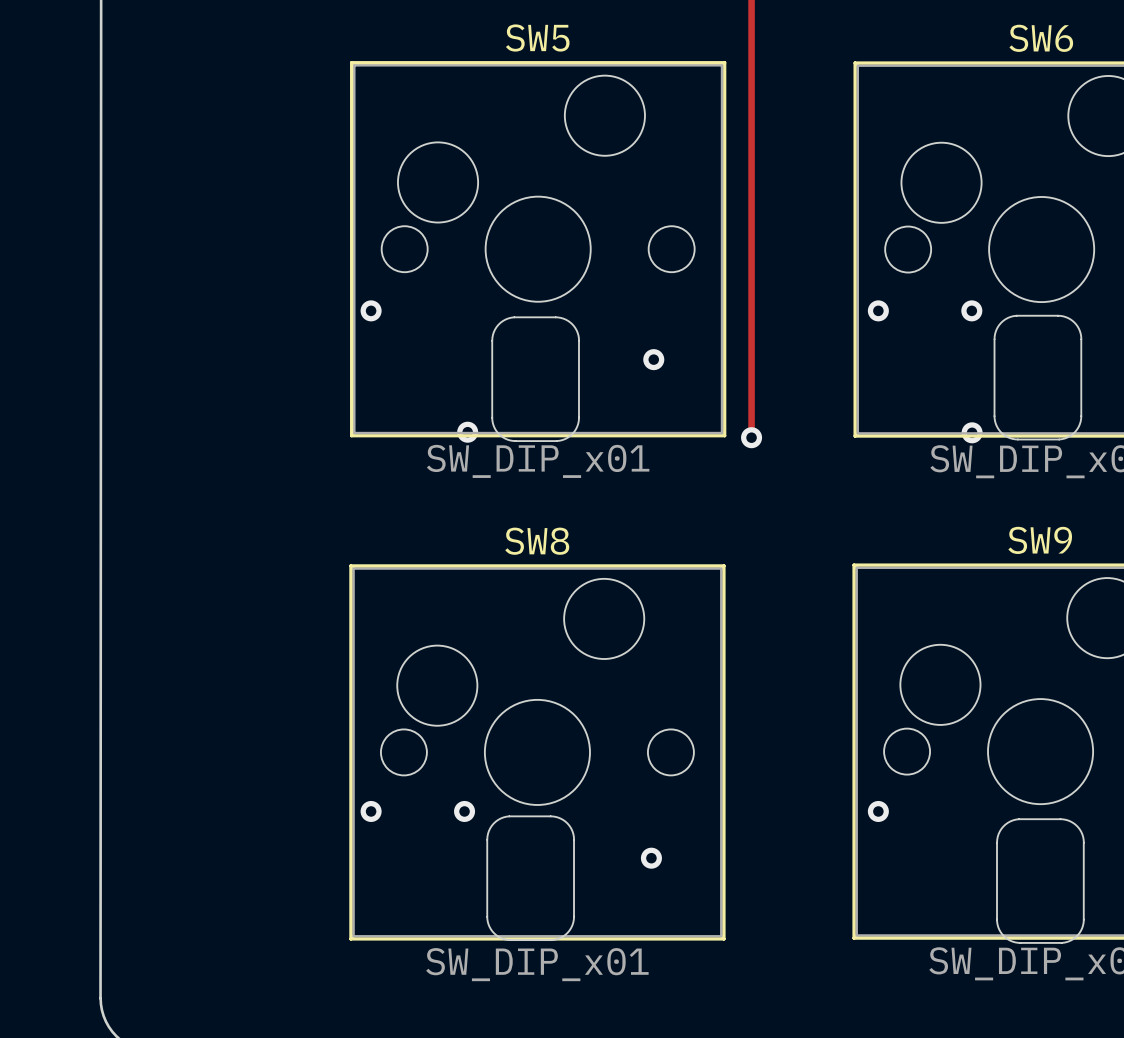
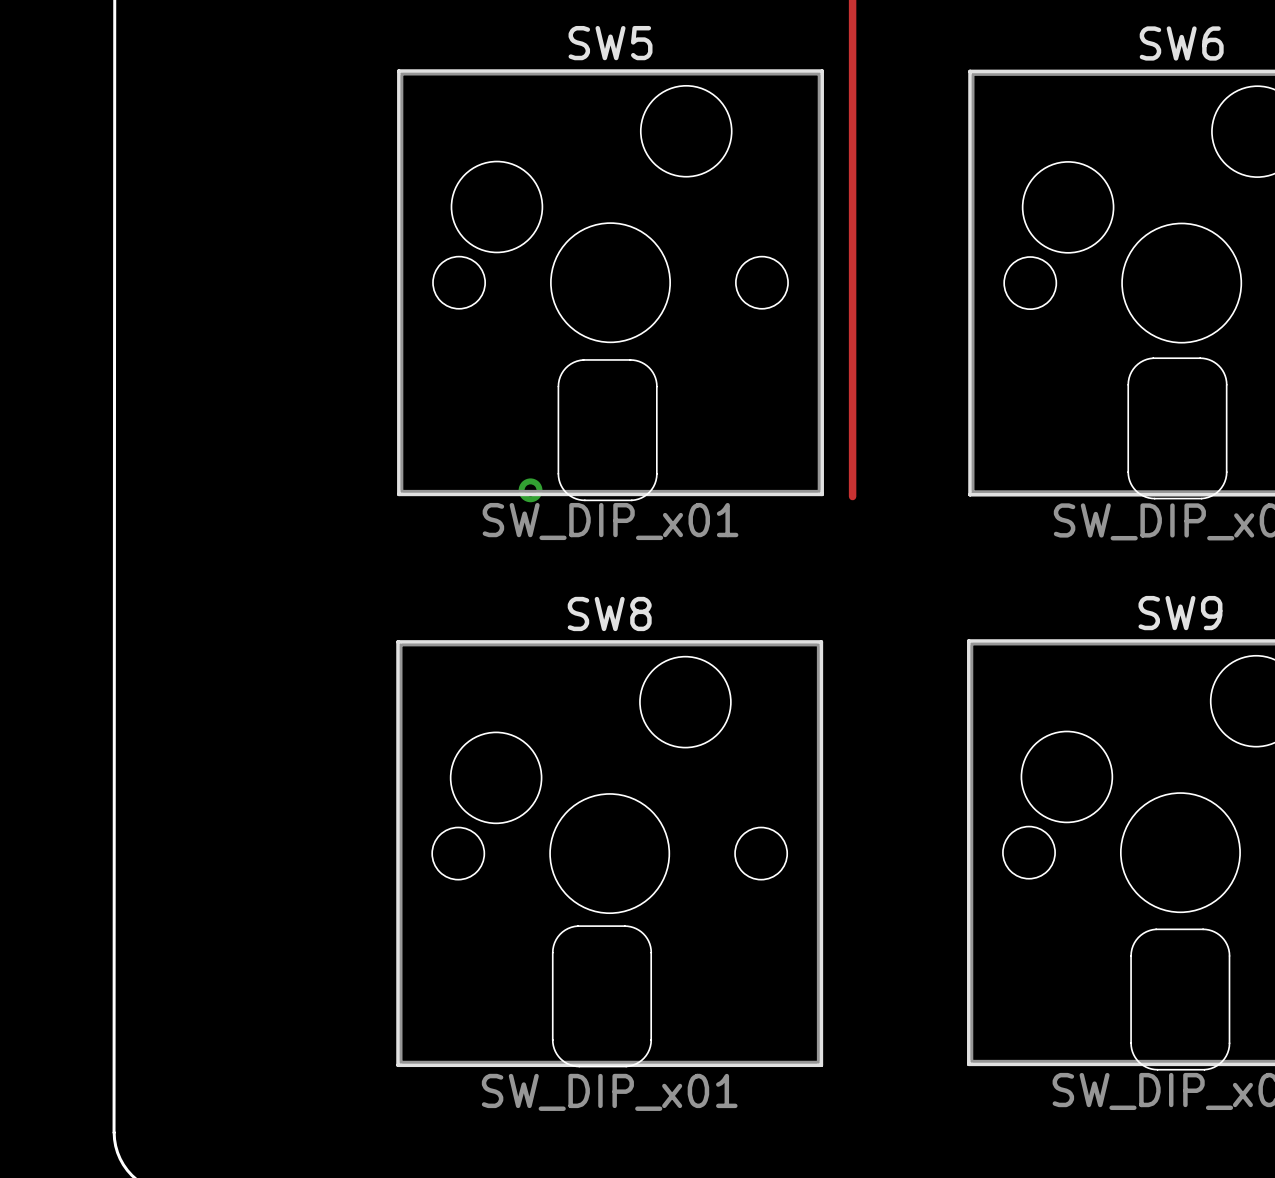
via: (371, 310) -> none
via: (878, 310) -> none
via: (971, 310) -> none
via: (653, 359) -> none
via: (972, 432) -> none
via: (751, 437) -> none
via: (371, 811) -> none
via: (464, 811) -> none
via: (878, 811) -> none
via: (651, 858) -> none

